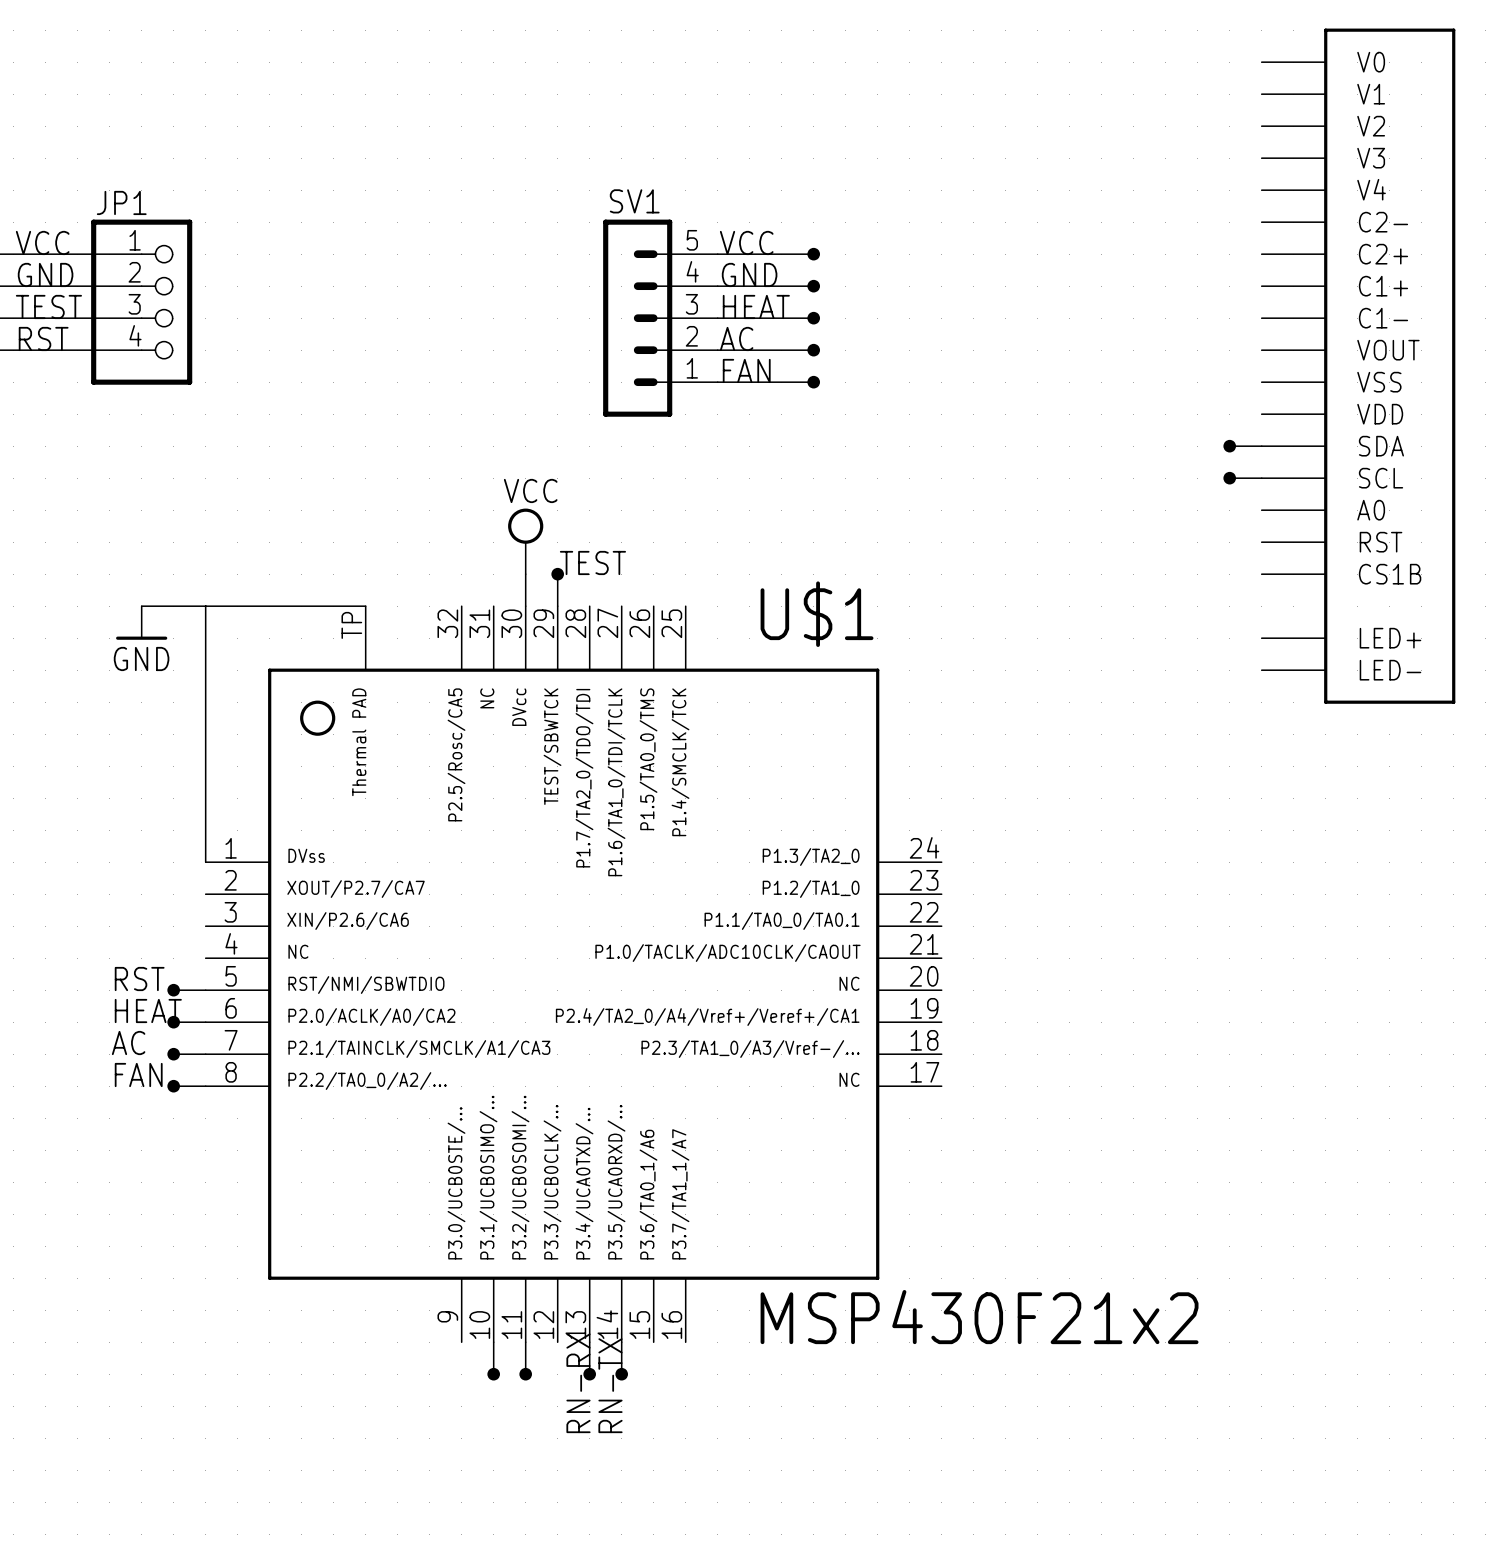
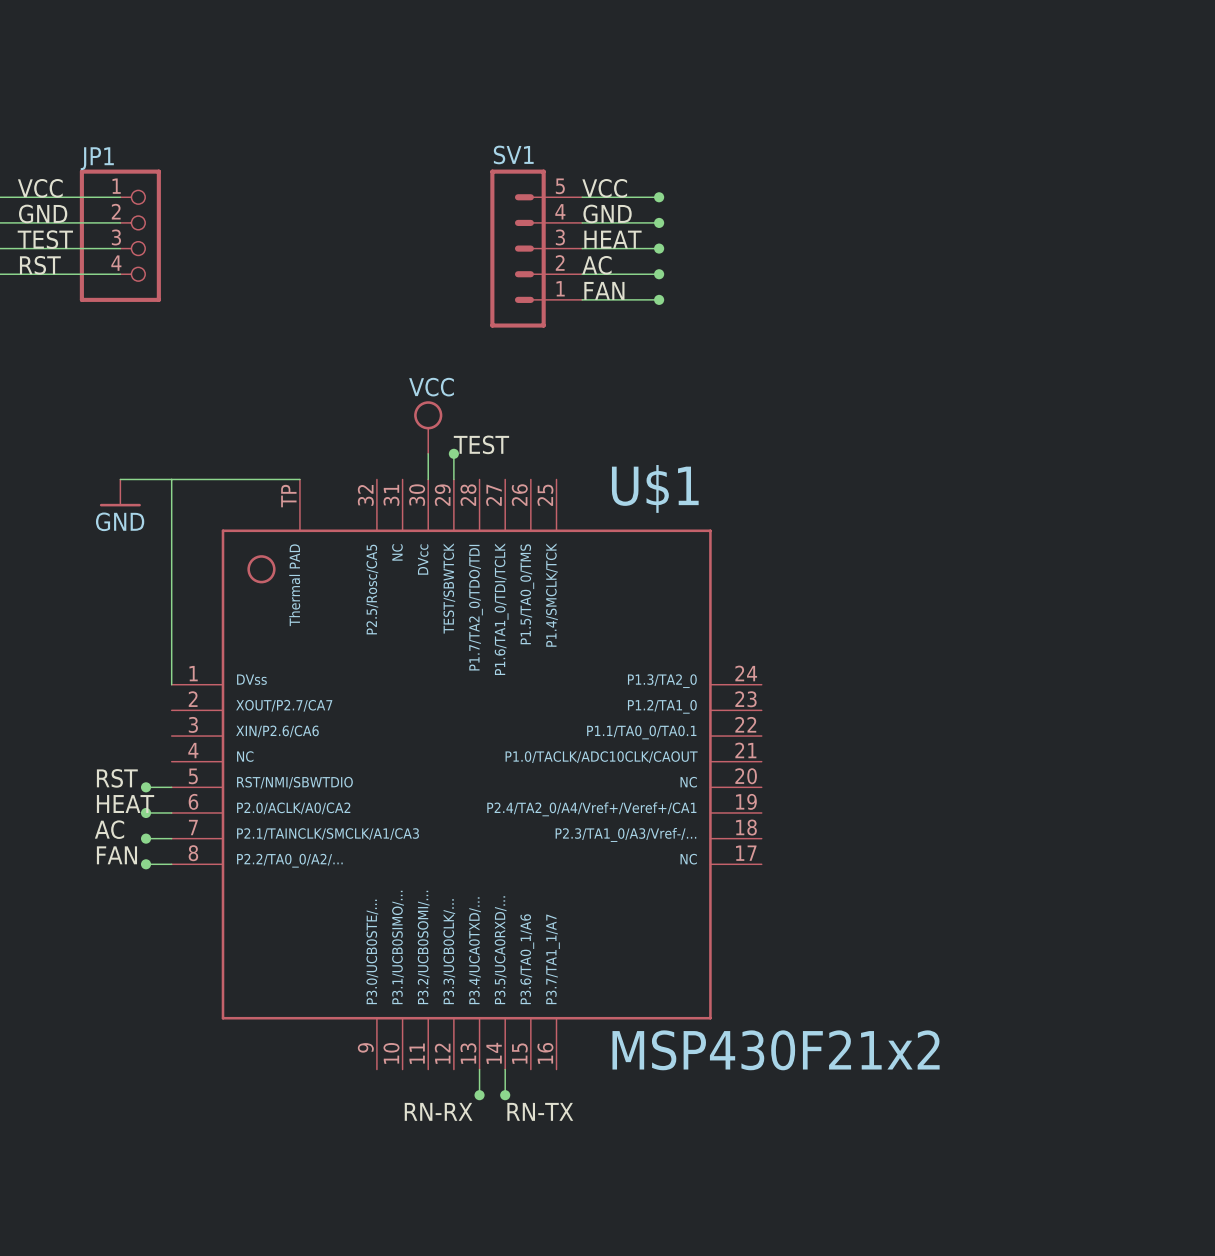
part: (1358, 366) -> none
wire: (1229, 446) (1261, 446) -> none
junction: (1229, 446) -> none
wire: (1229, 478) (1261, 478) -> none
junction: (1229, 478) -> none
wire: (493, 1342) (493, 1374) -> none
wire: (525, 1342) (525, 1374) -> none
junction: (493, 1374) -> none
junction: (525, 1374) -> none
label rotation: 0° (578, 1383) -> 90° clockwise (438, 1111)
label rotation: 0° (610, 1385) -> 90° clockwise (540, 1111)

